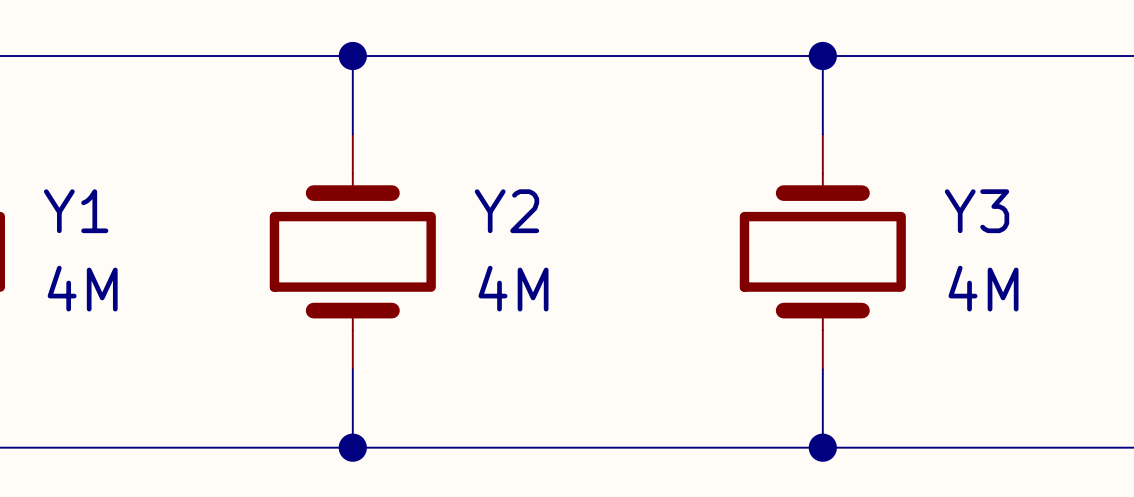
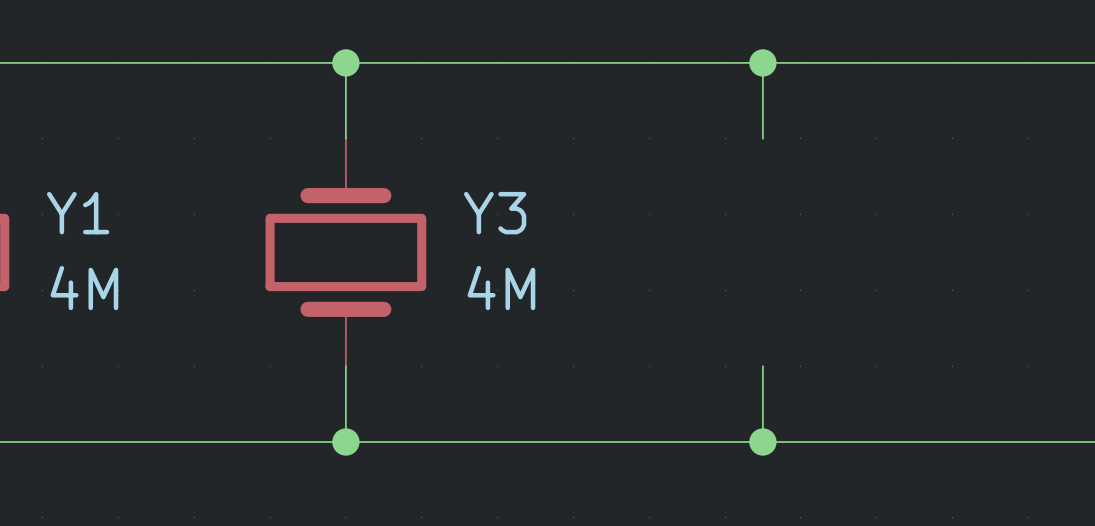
wire: (822, 56) (822, 134) -> (762, 62) (762, 138)
junction position: (822, 56) -> (762, 62)
Y2 name: Y2 (506, 211) -> Y3 (495, 213)
Y3: 4M (822, 251) -> none
wire: (822, 369) (822, 447) -> (762, 366) (762, 442)
junction position: (822, 447) -> (762, 442)

